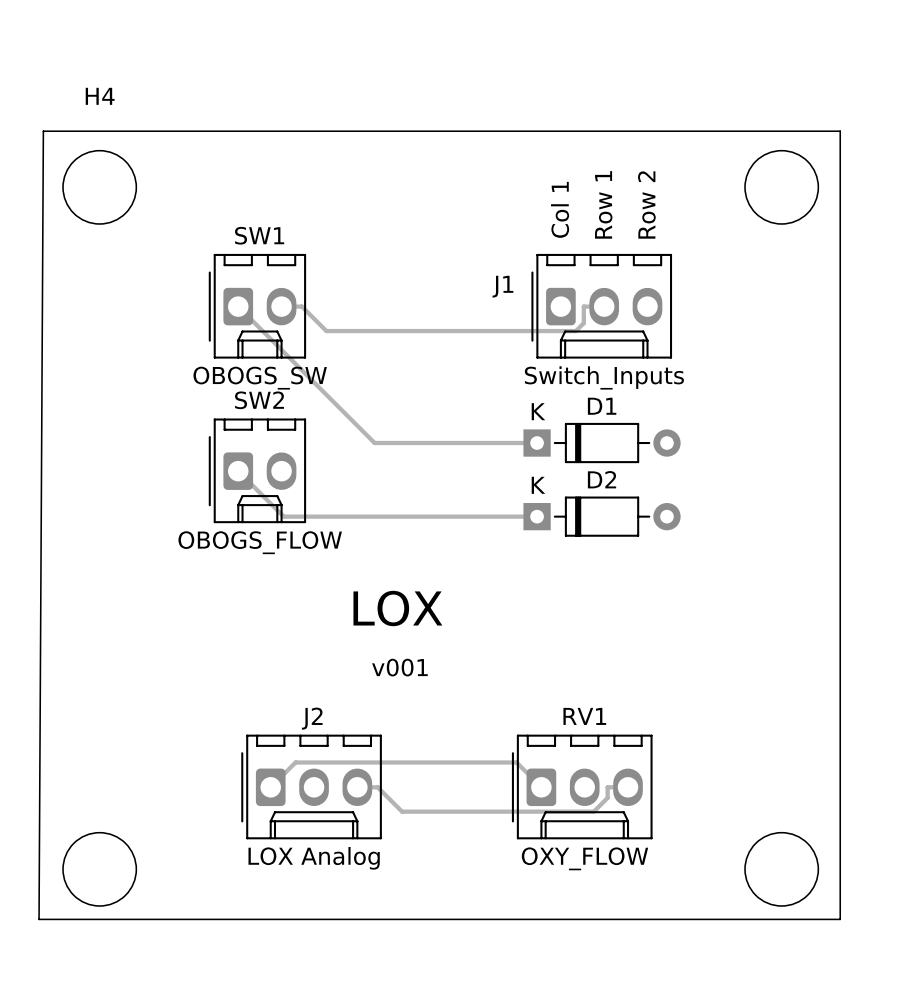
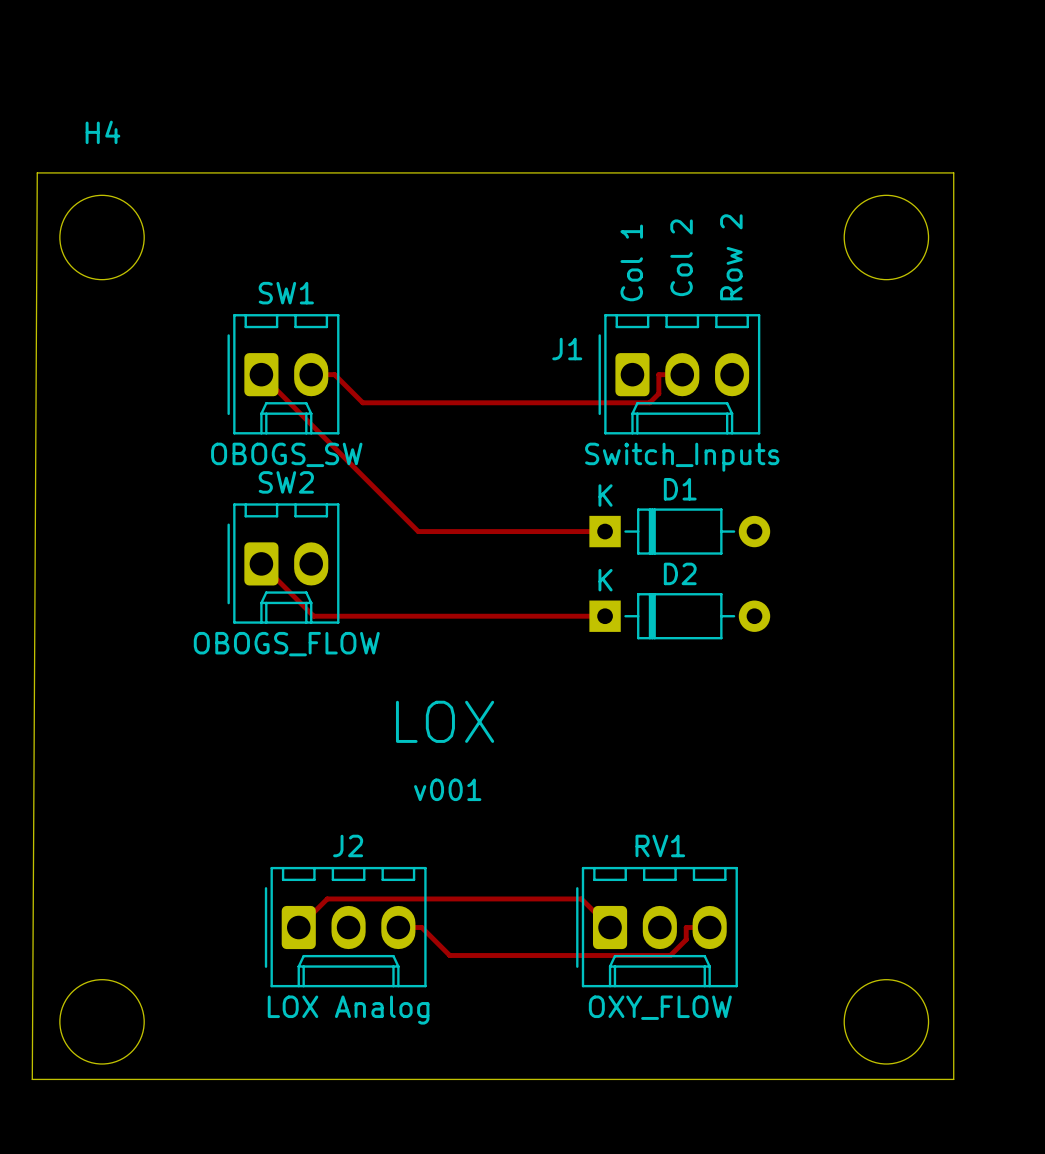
text: Row 1 (603, 204) -> Col 2 (681, 257)

